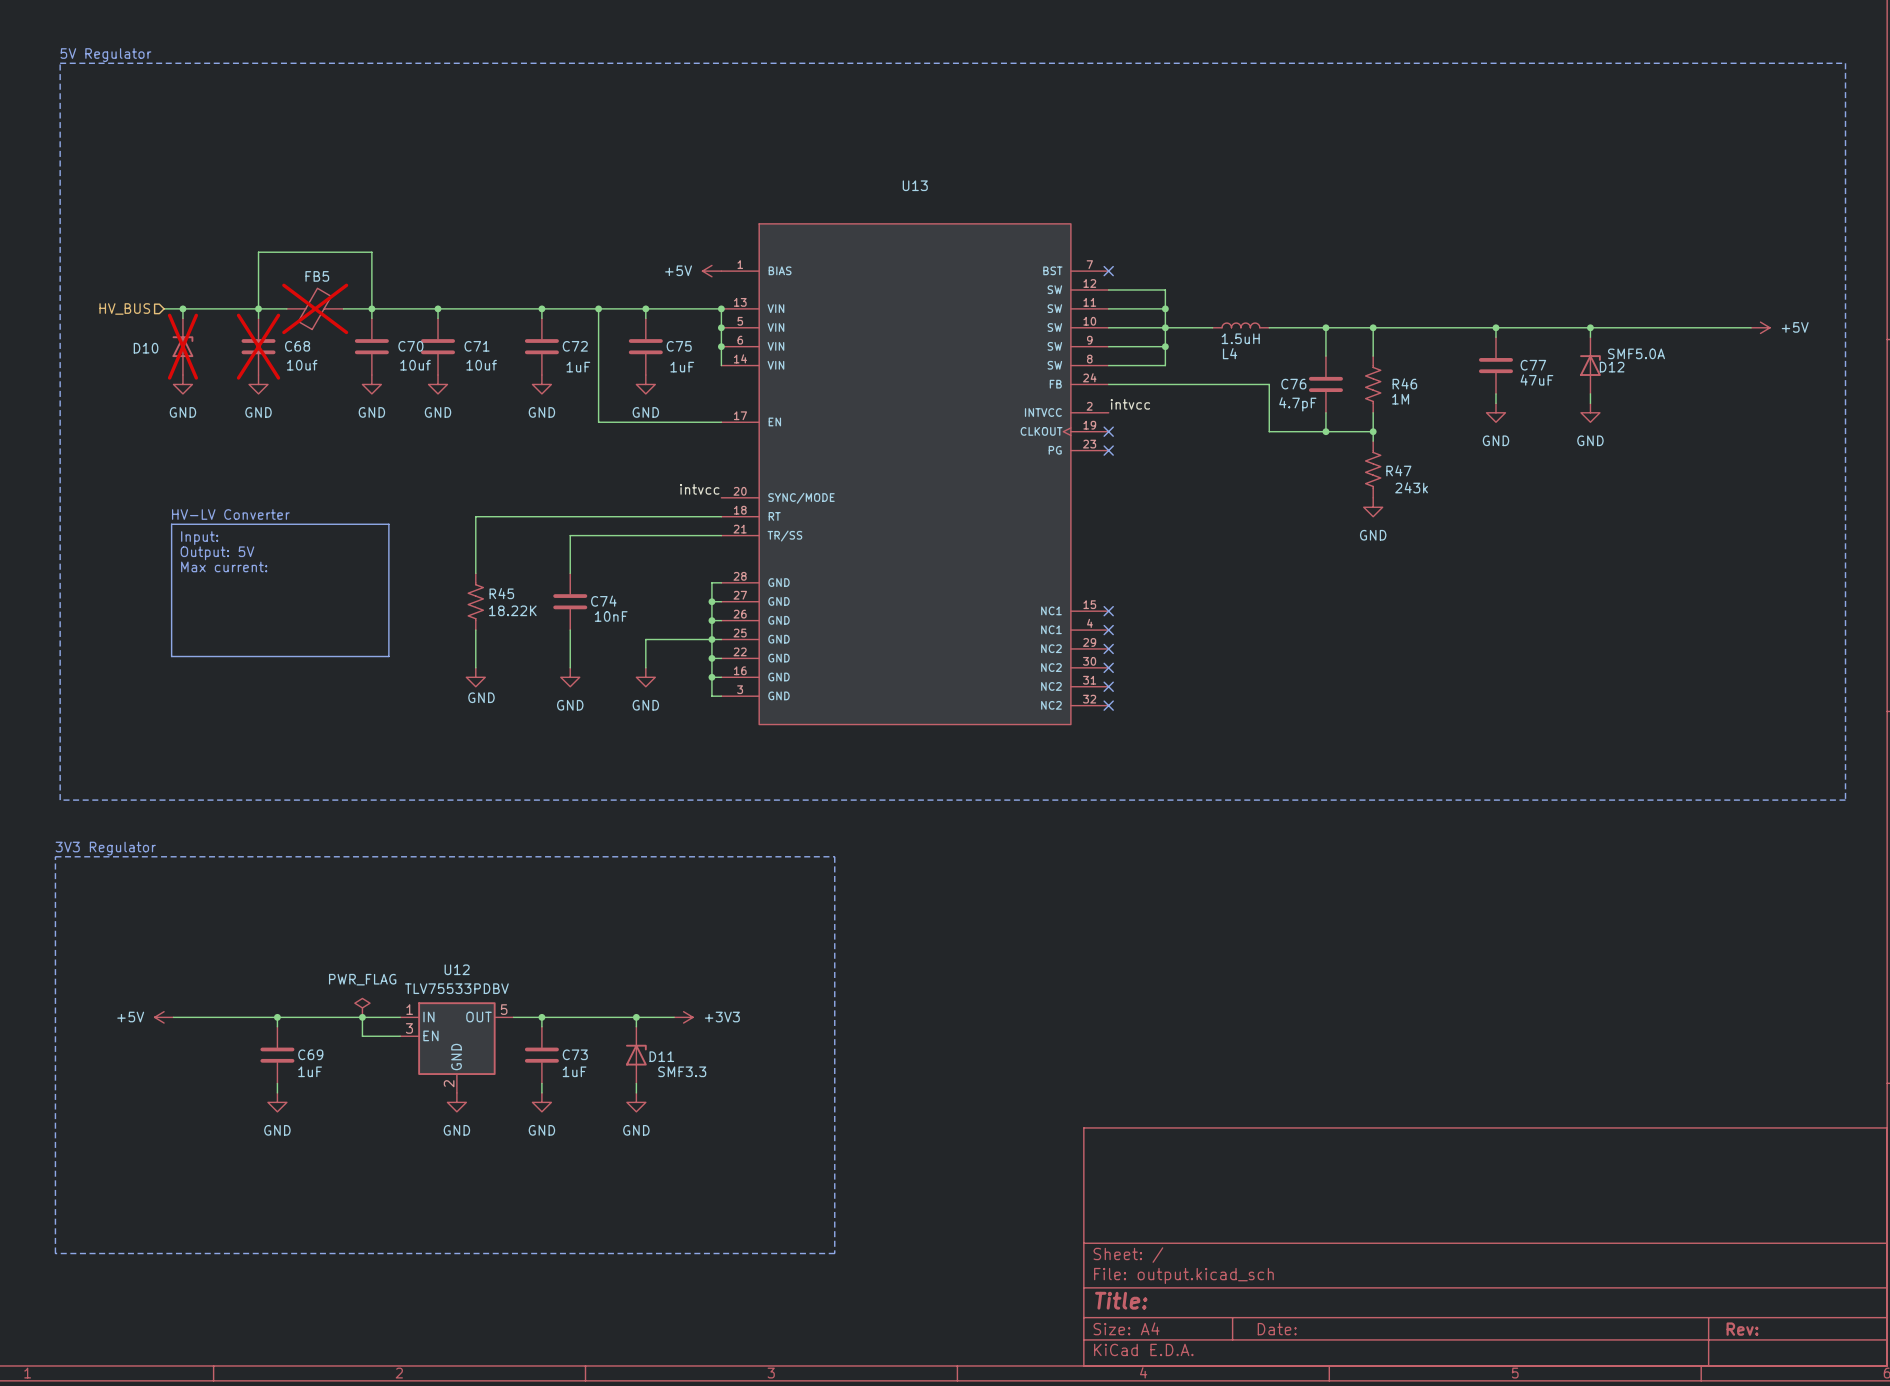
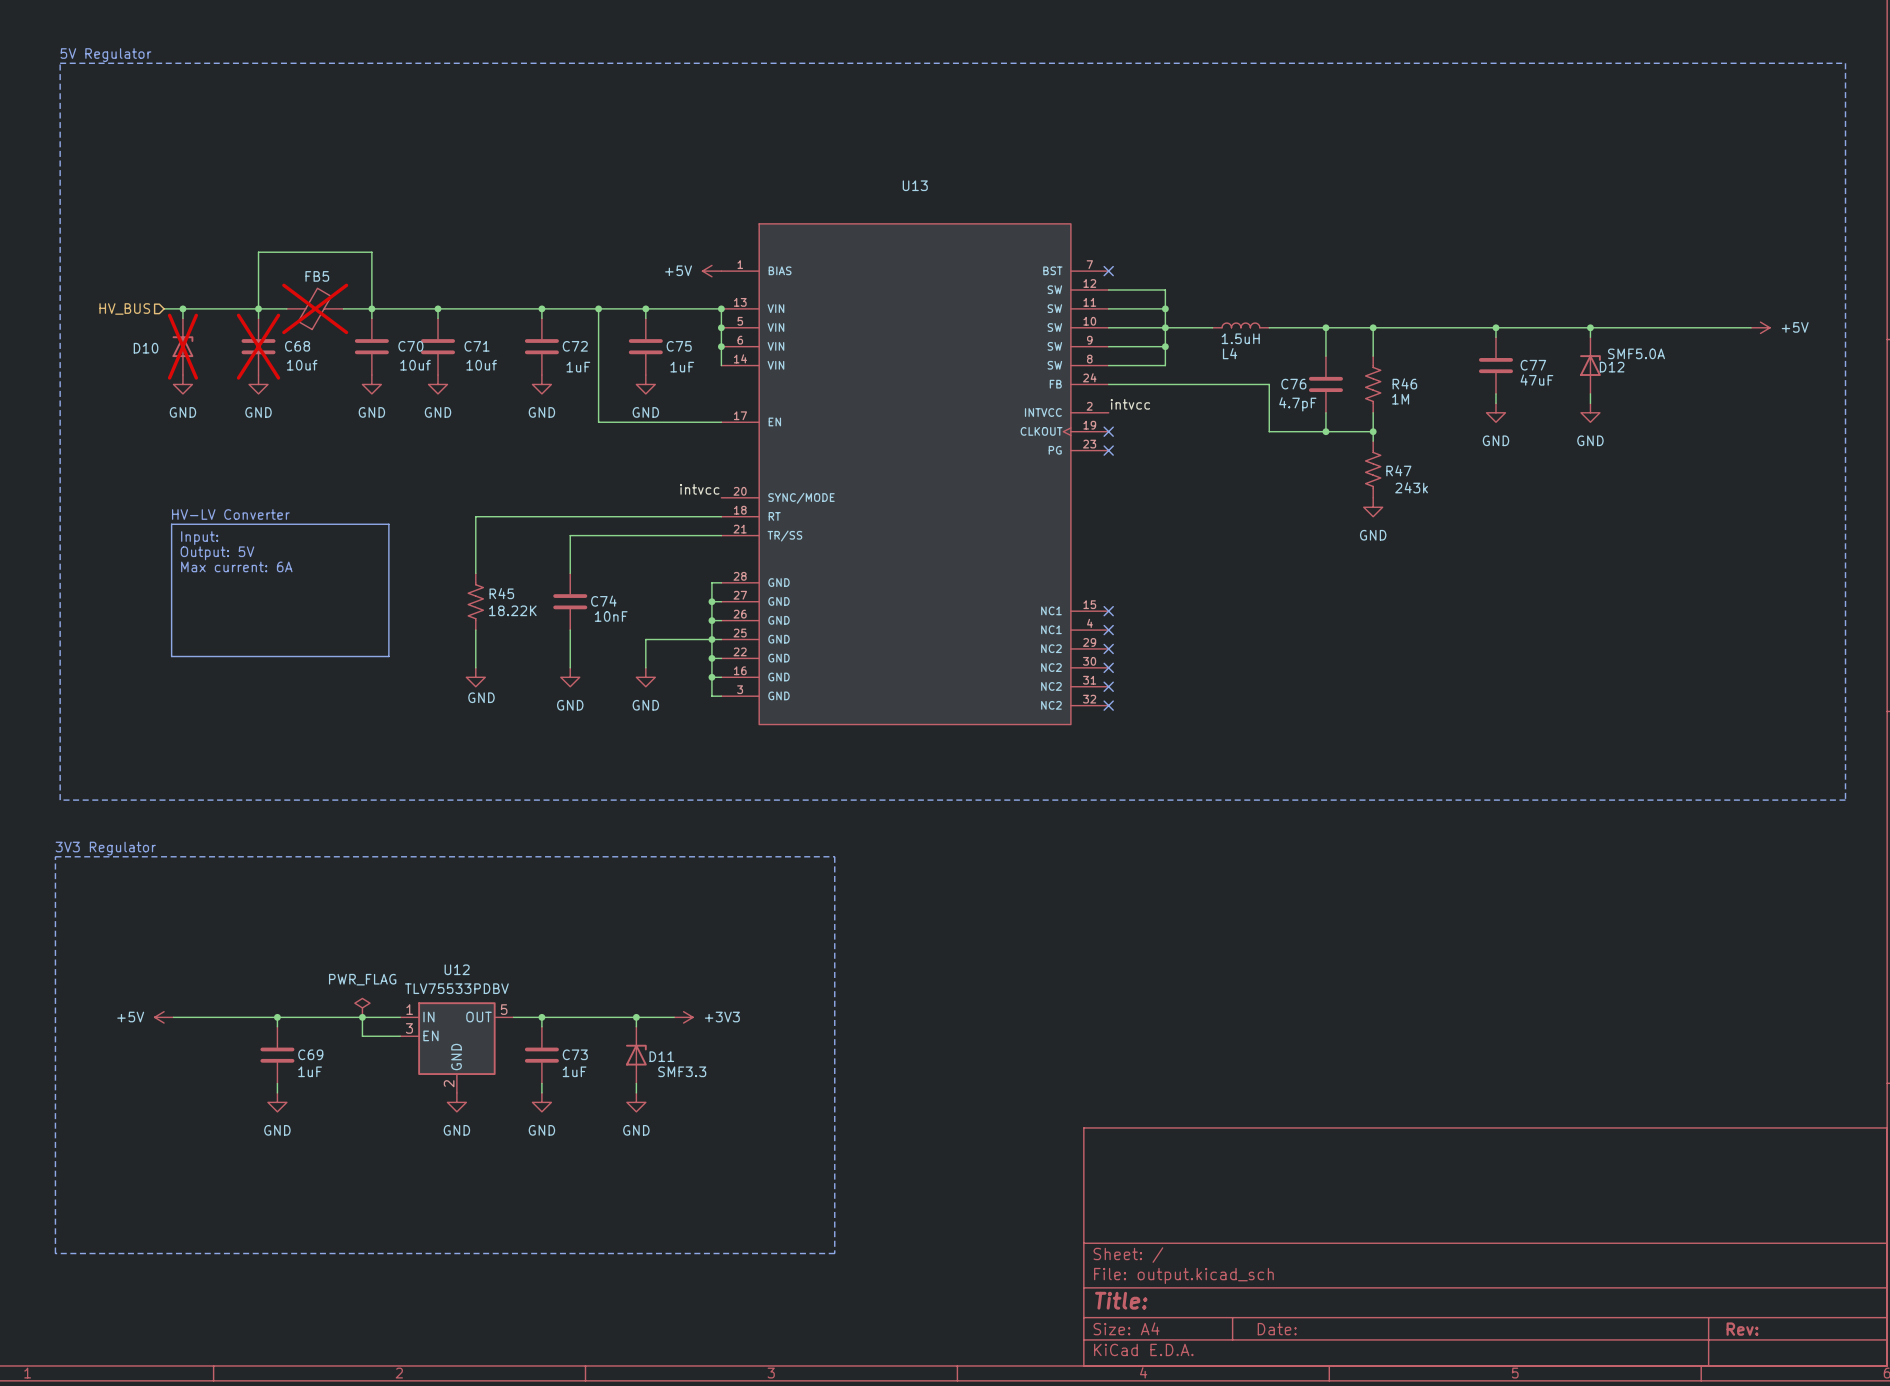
text: Max current: (224, 566) -> Max current: 6A (236, 566)

